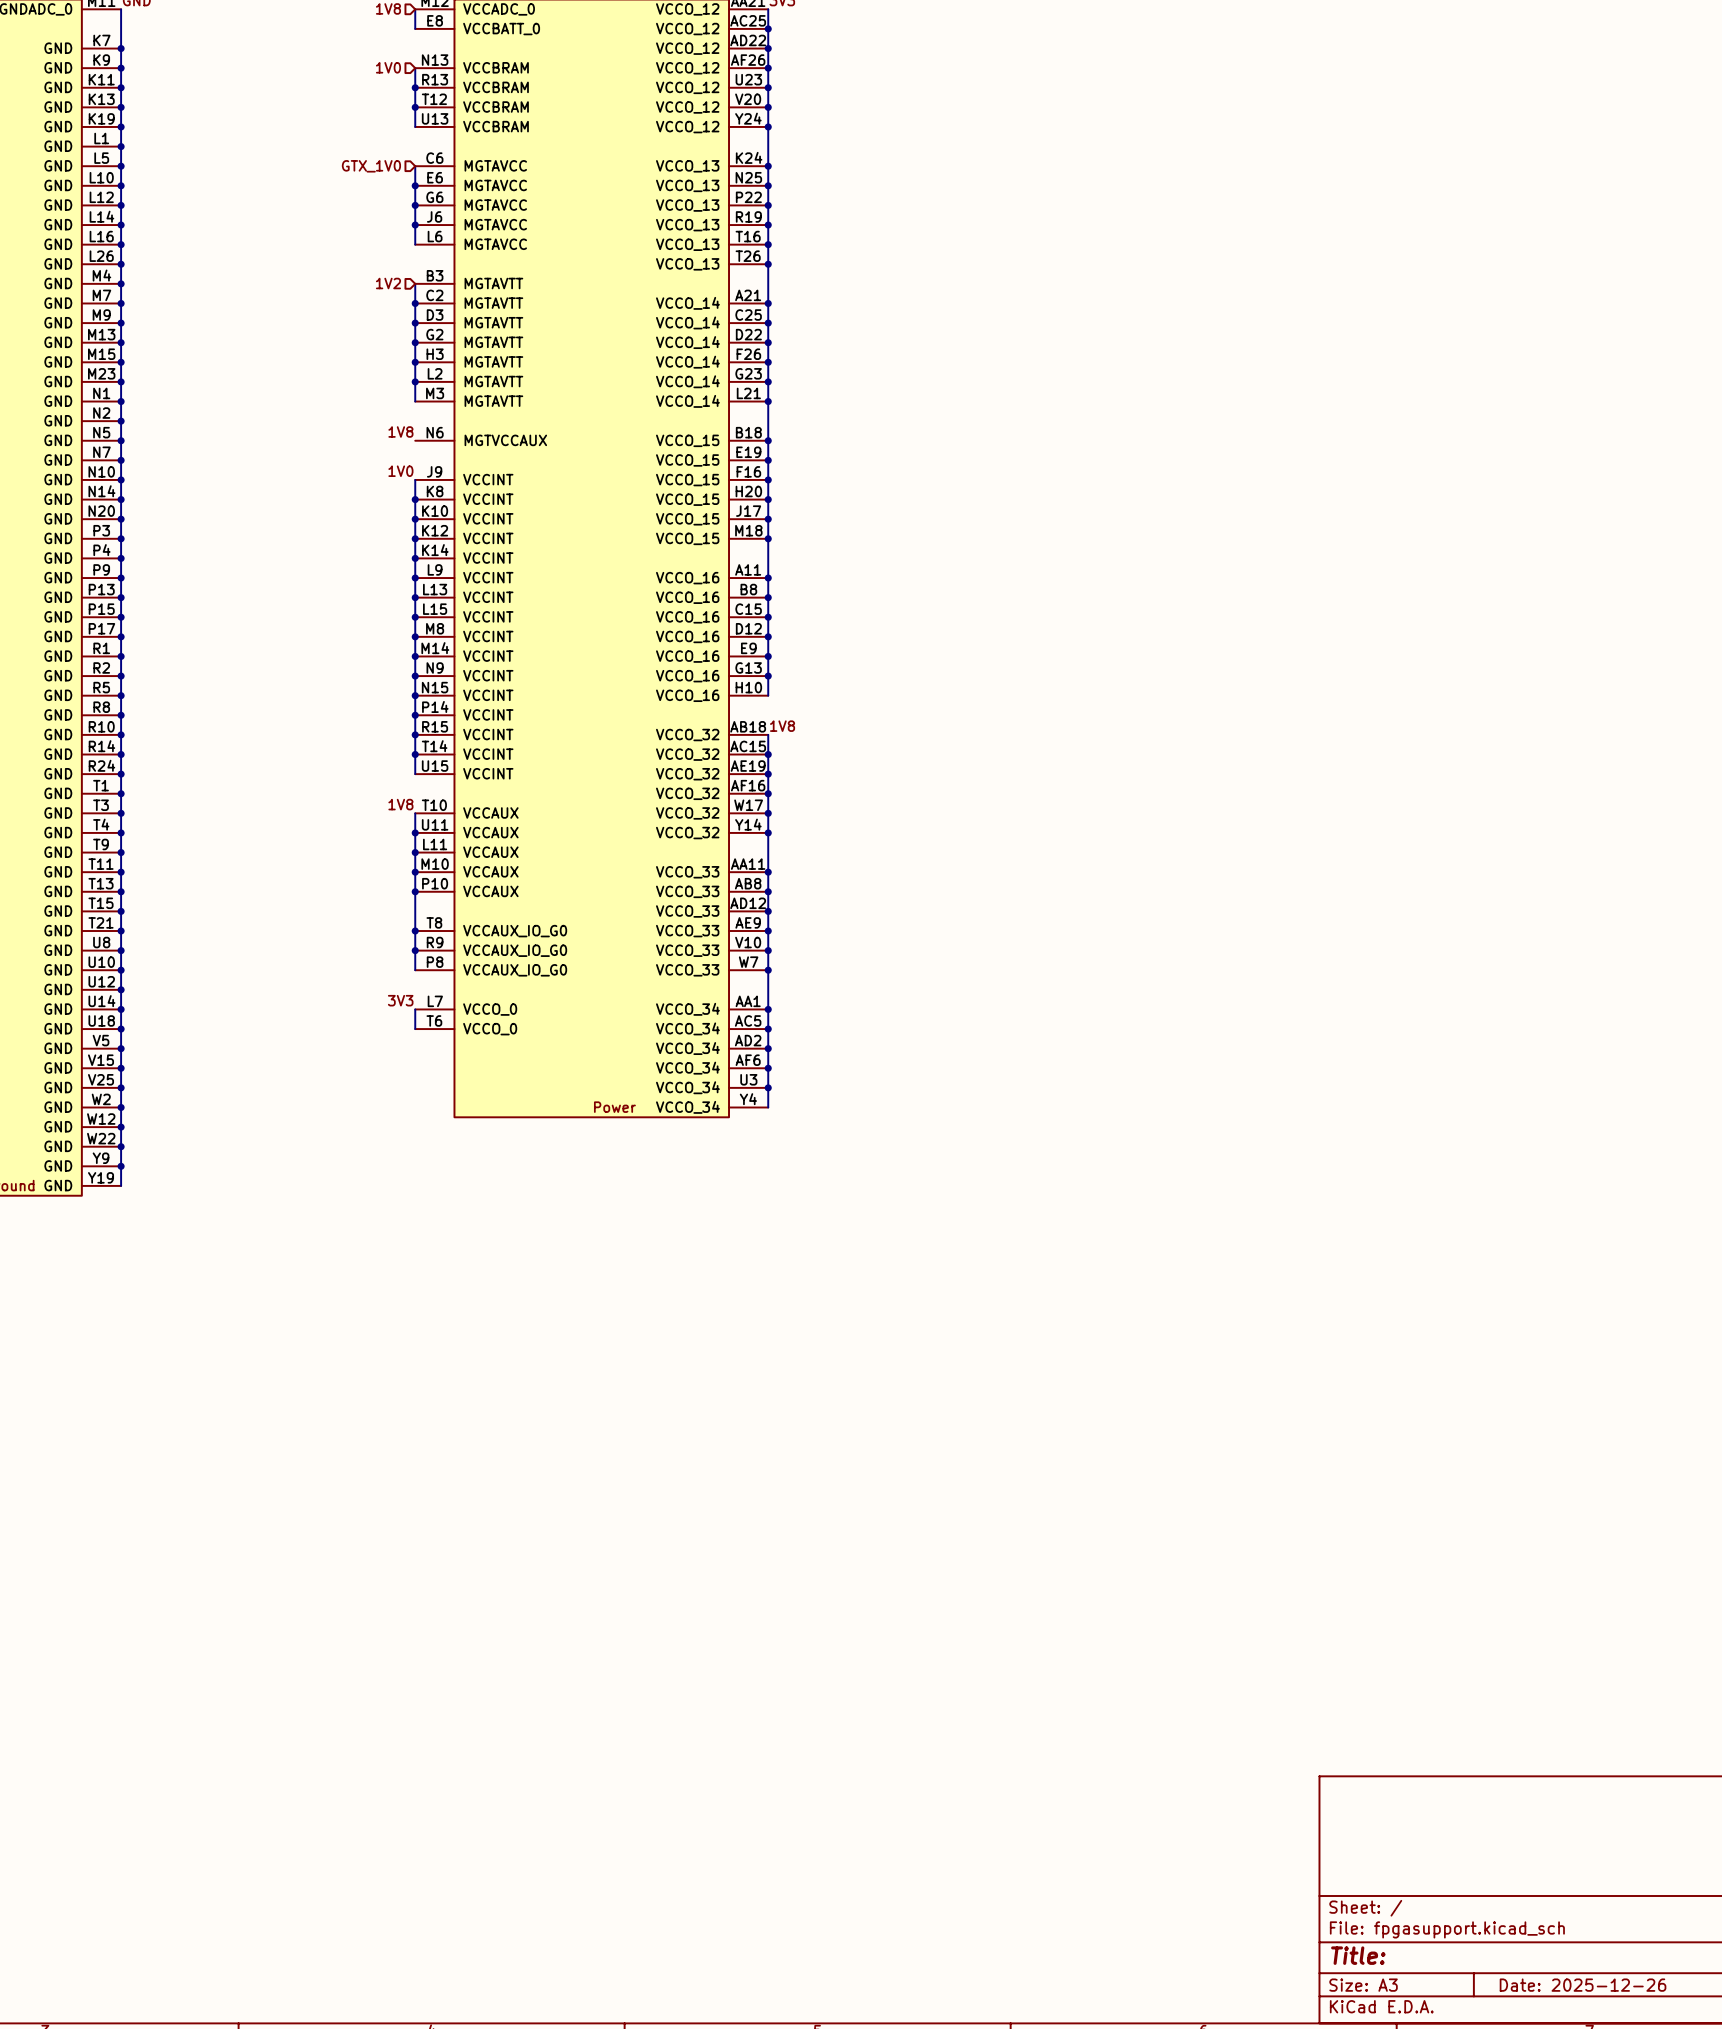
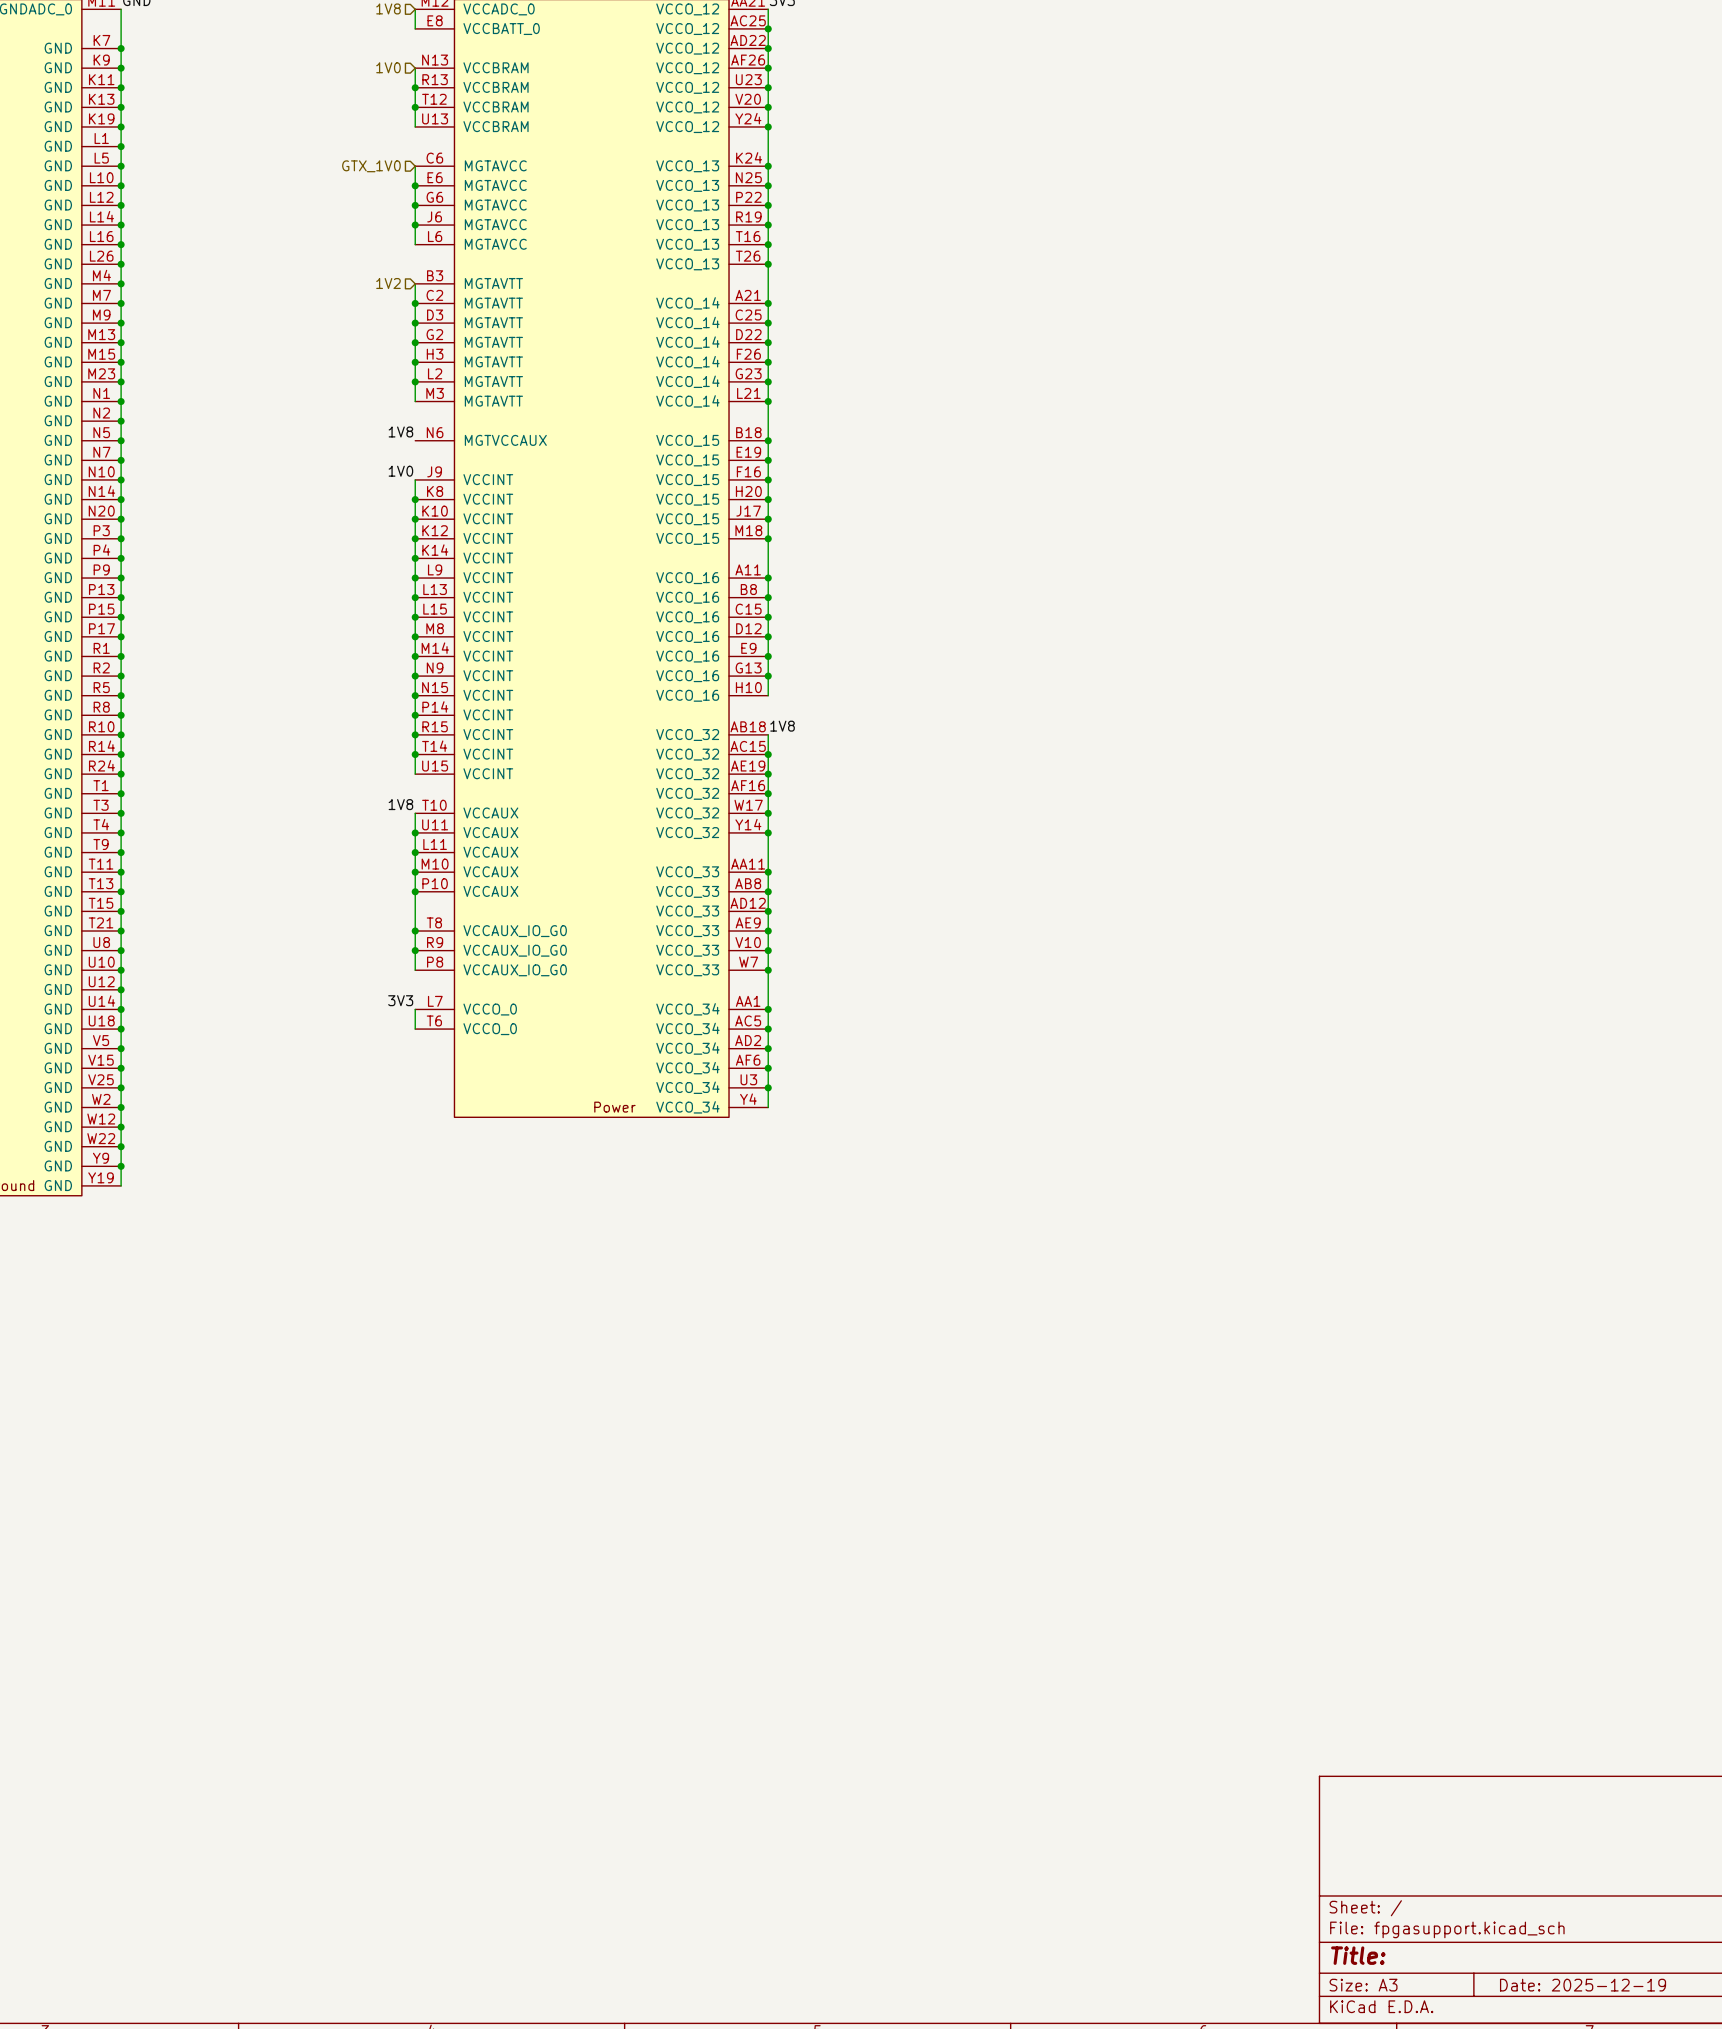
title block: Date: 2025-12-26 (1583, 1985) -> Date: 2025-12-19 (1583, 1985)

